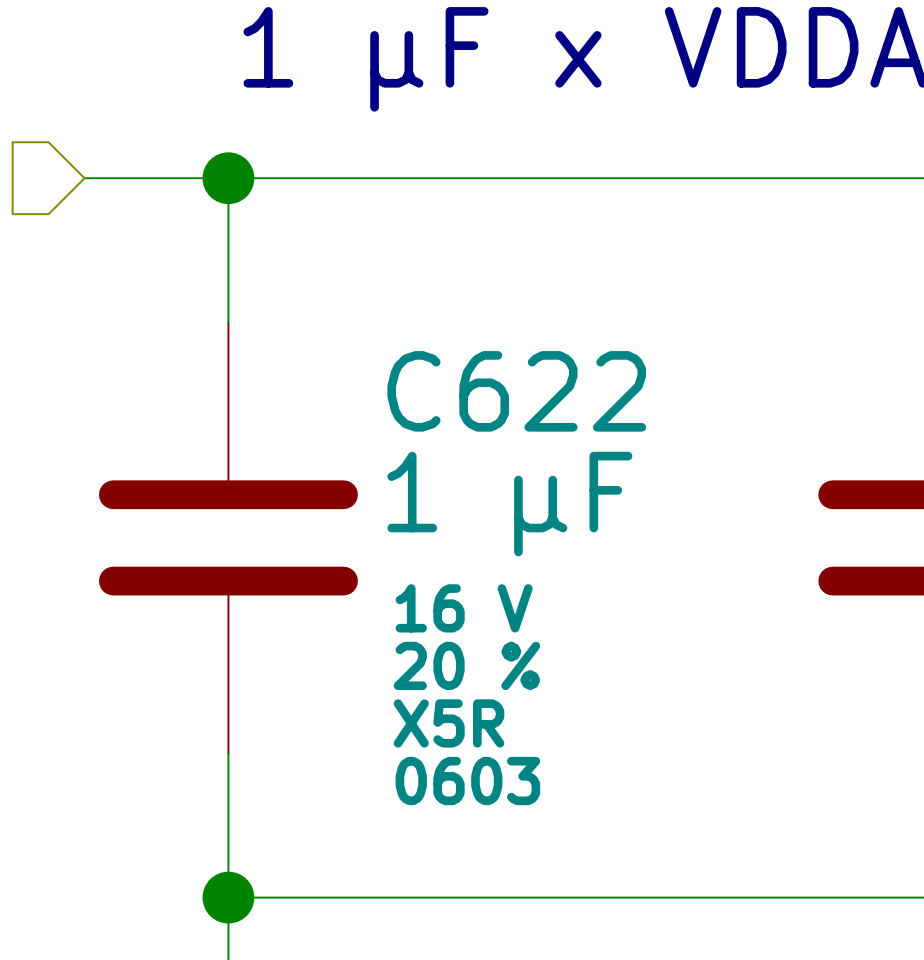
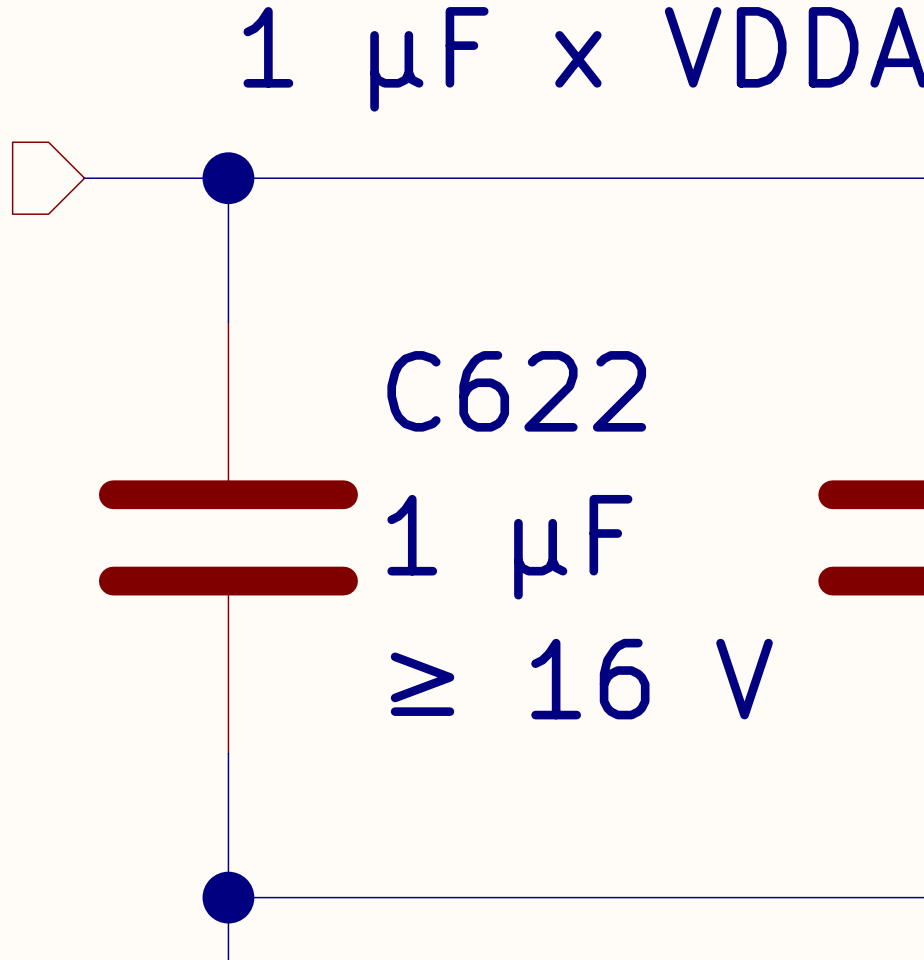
C622 value position: 1 µF (509, 504) -> 1 µF (509, 547)
C622 text: 16 V (464, 608) -> ≥ 16 V (581, 679)
C622 text: 20 % (466, 665) -> none
C622 text: X5R (449, 723) -> none
C622 text: 0603 (467, 781) -> none

